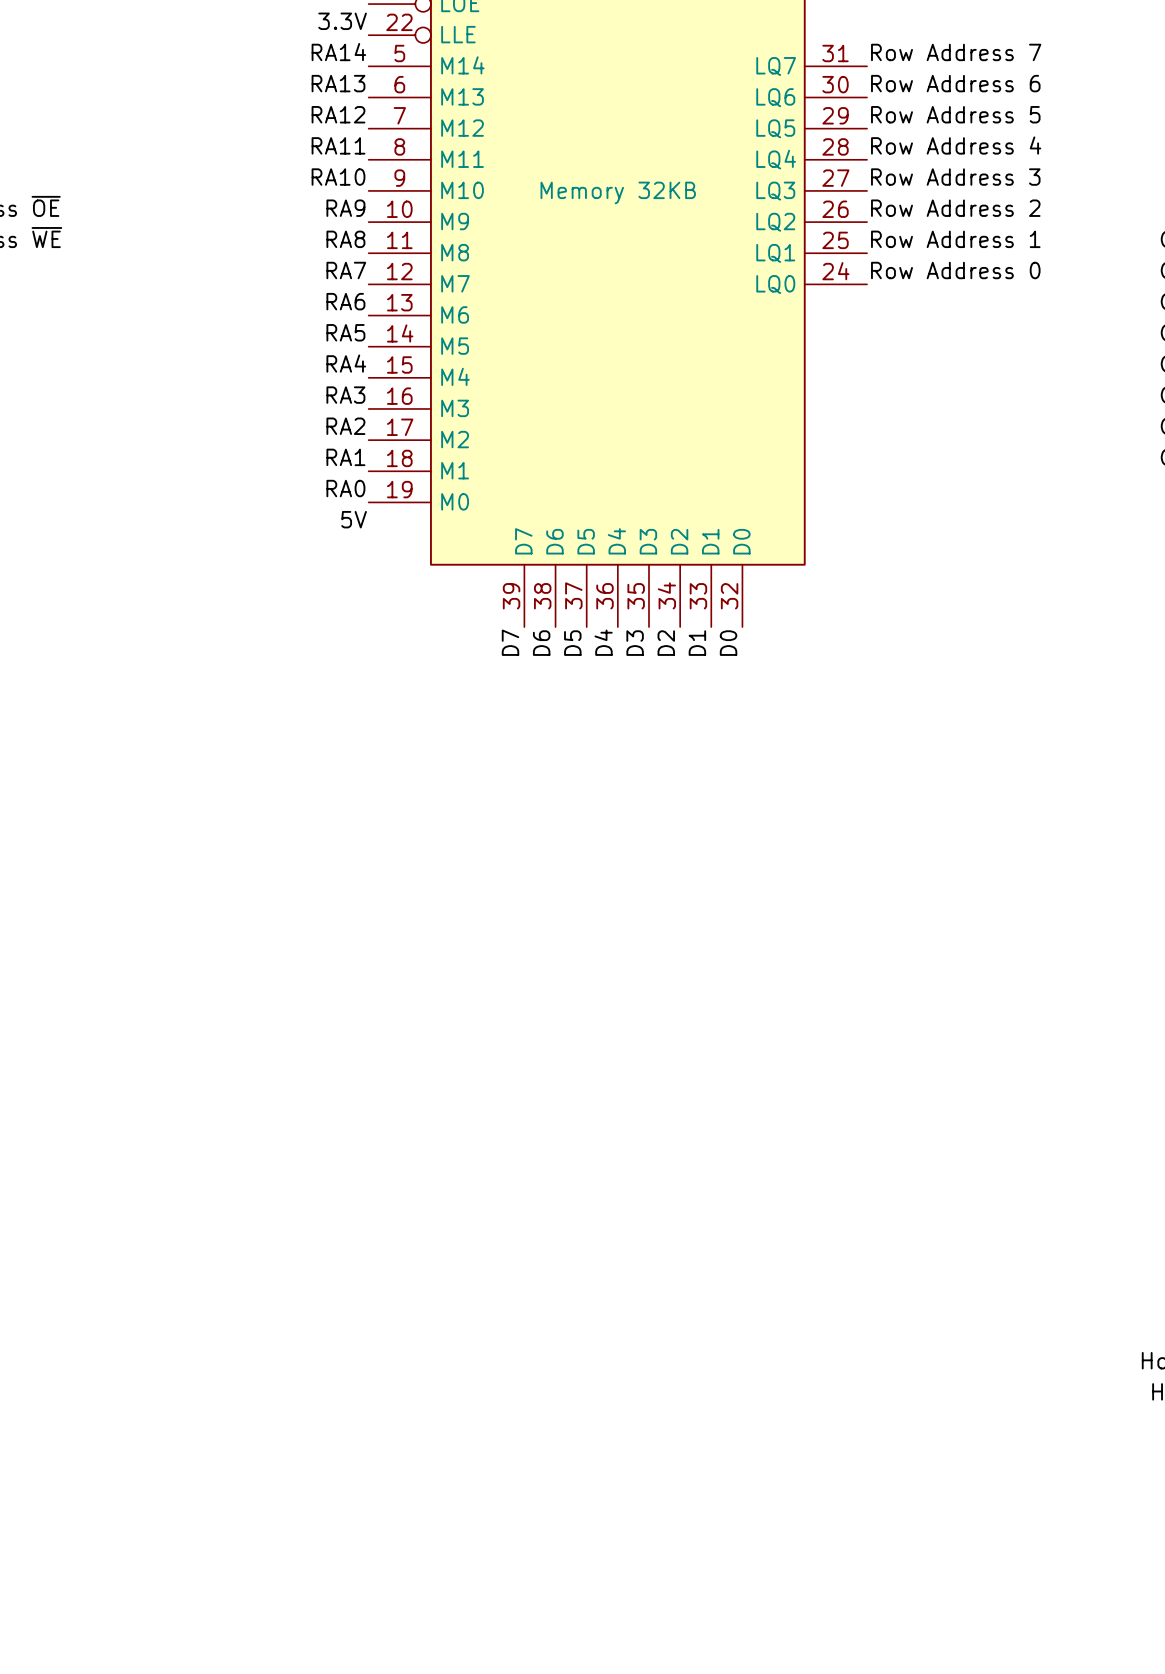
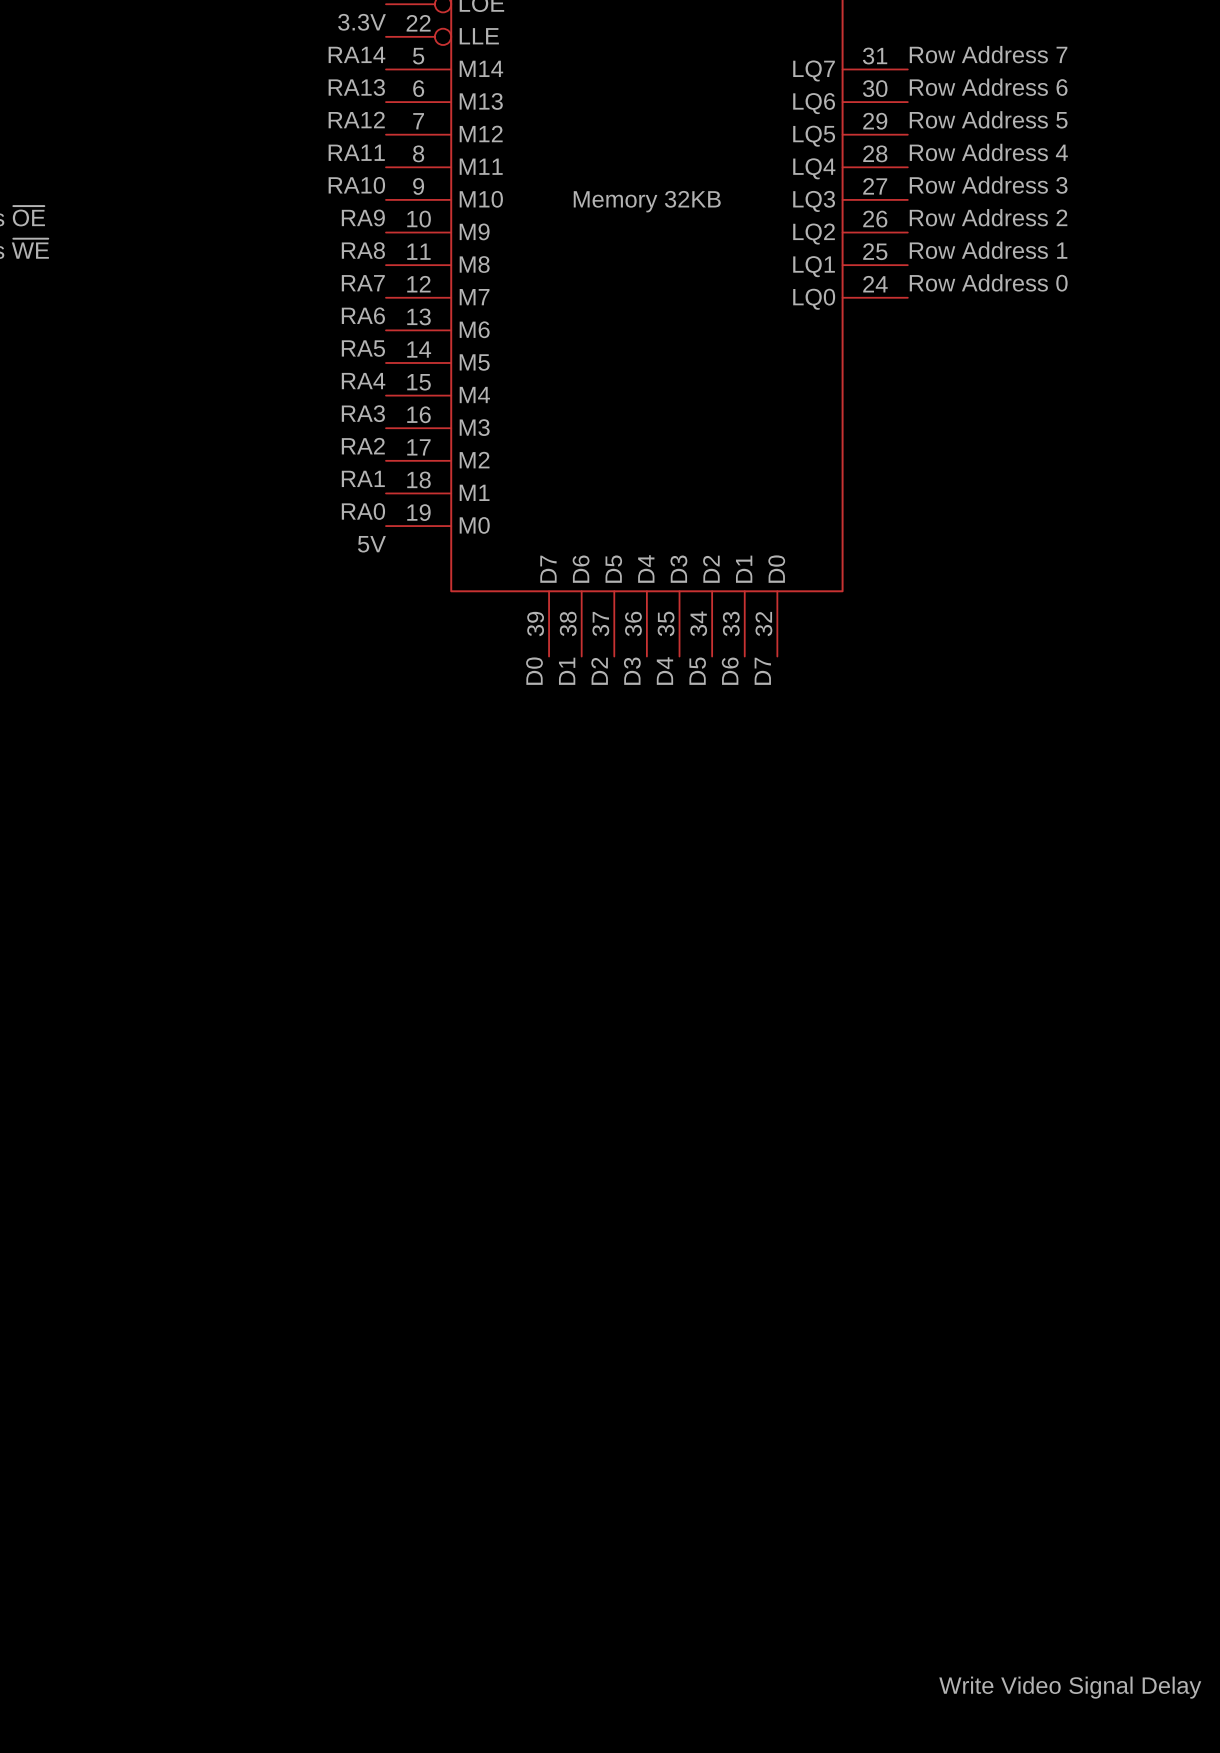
label: D7 (510, 642) -> D0 (534, 671)
label: D4 (603, 642) -> D3 (632, 671)
label: D6 (541, 643) -> D1 (567, 671)
label: D5 (572, 643) -> D2 (599, 671)
label: D3 (635, 643) -> D4 (664, 671)
label: D2 (666, 643) -> D5 (697, 671)
label: D1 (697, 643) -> D6 (730, 671)
label: D0 (728, 643) -> D7 (762, 671)
label: none -> Write Video Signal Delay (1070, 1687)

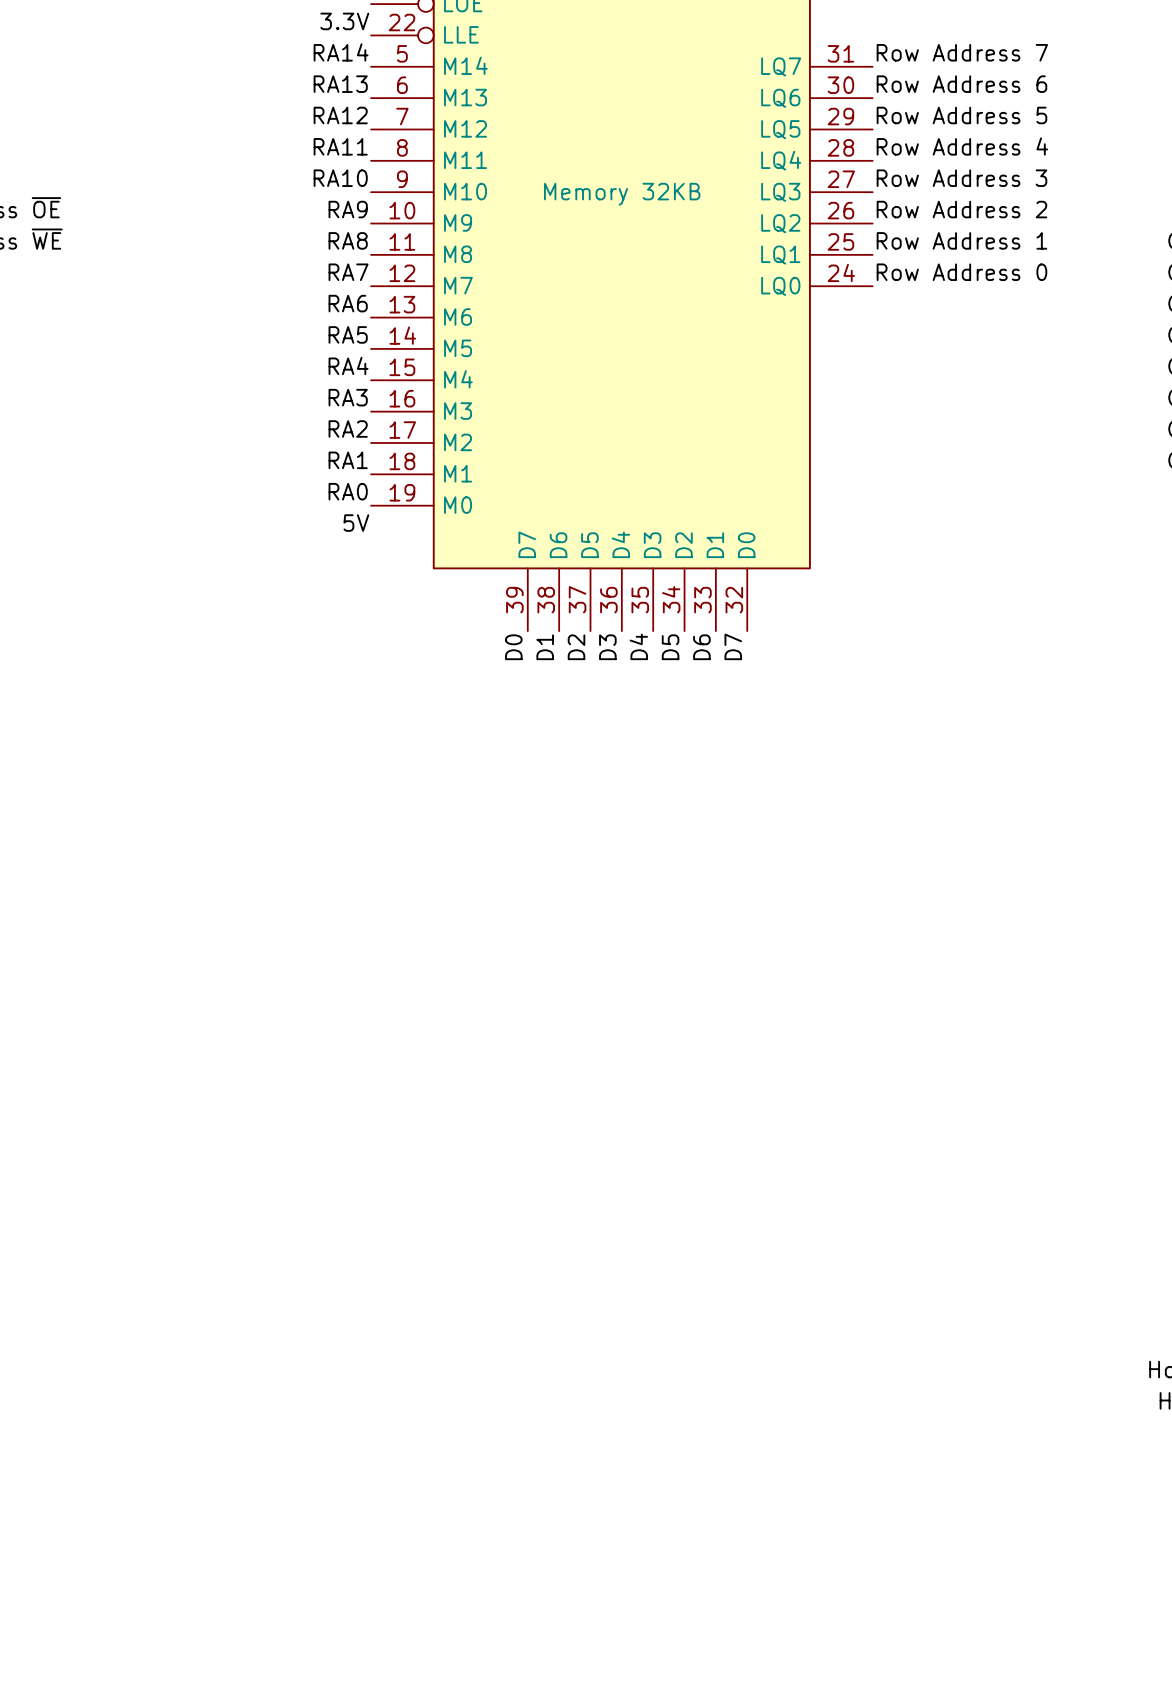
label: Write Video Signal Delay (1070, 1687) -> none

